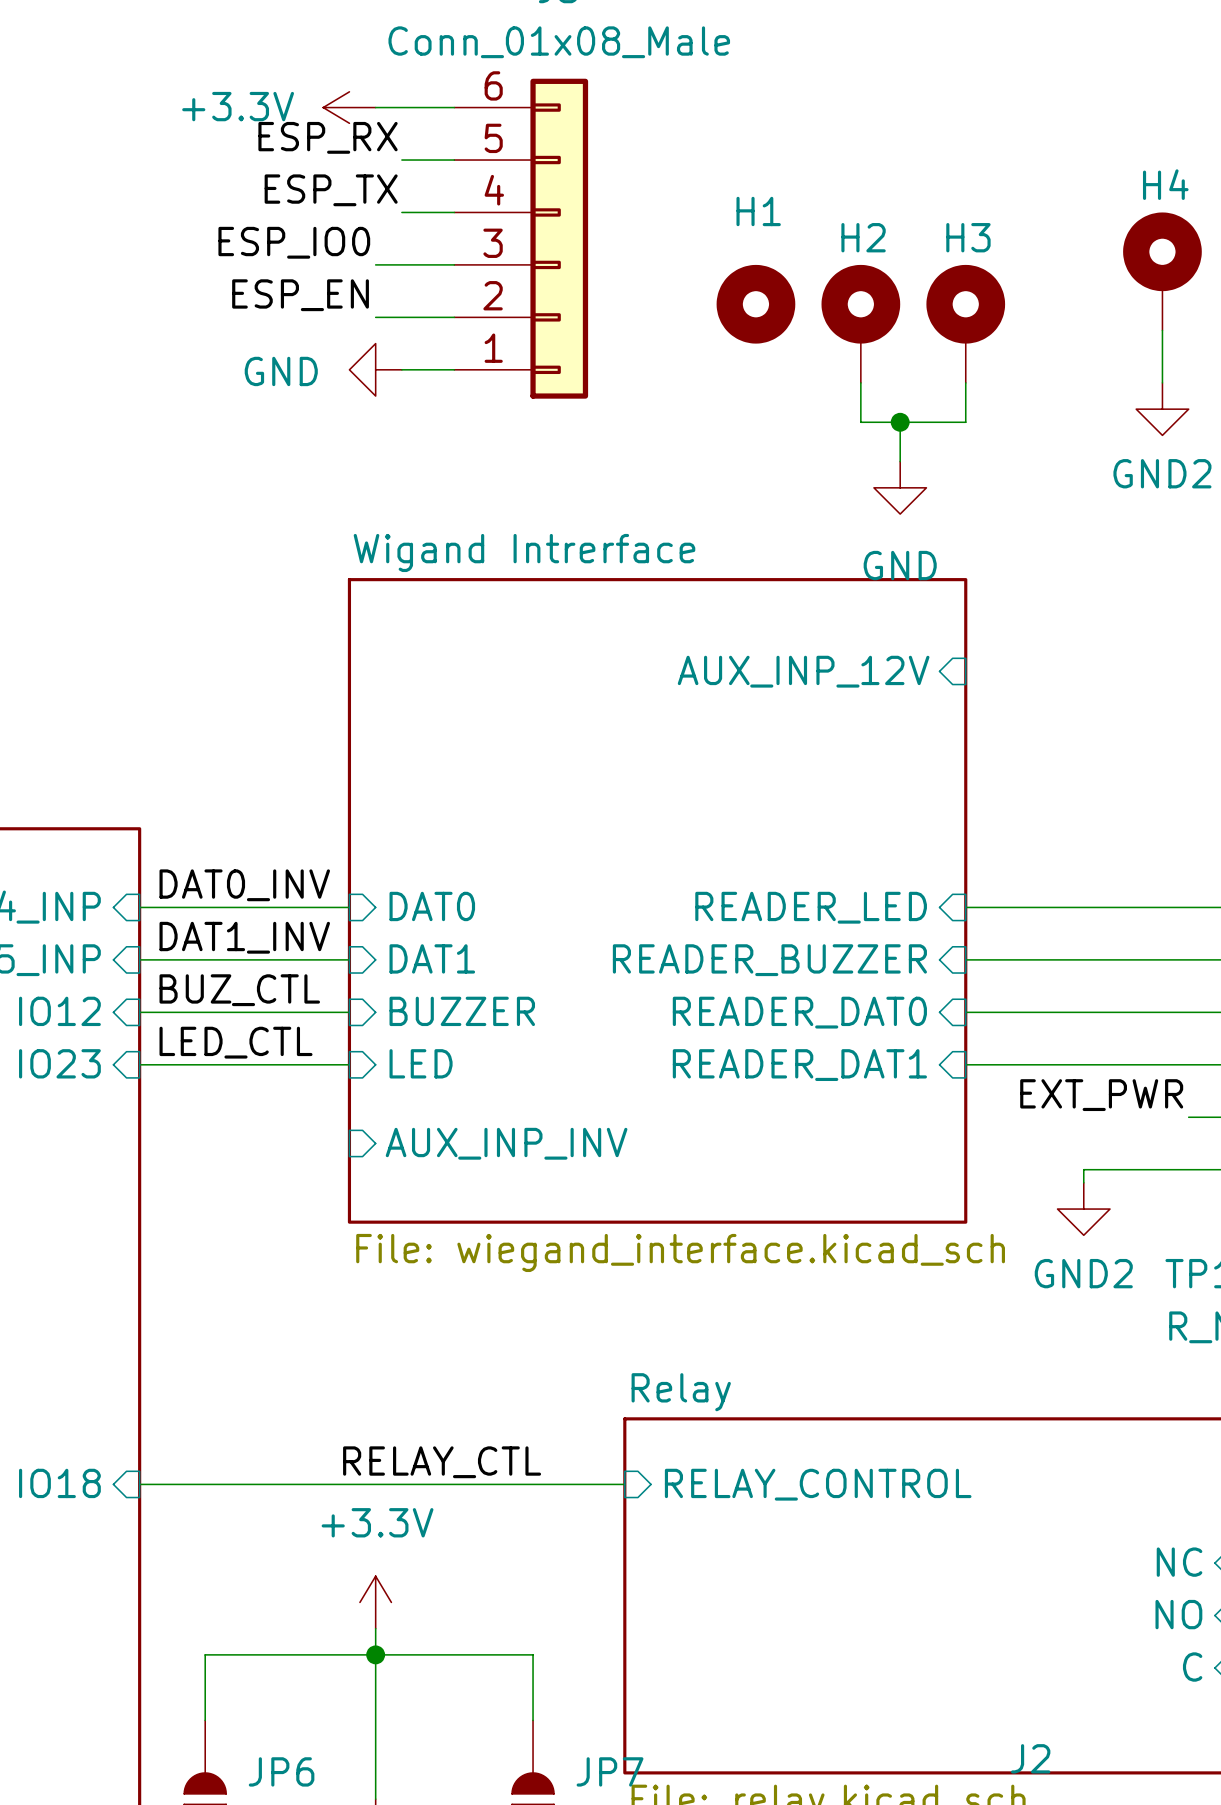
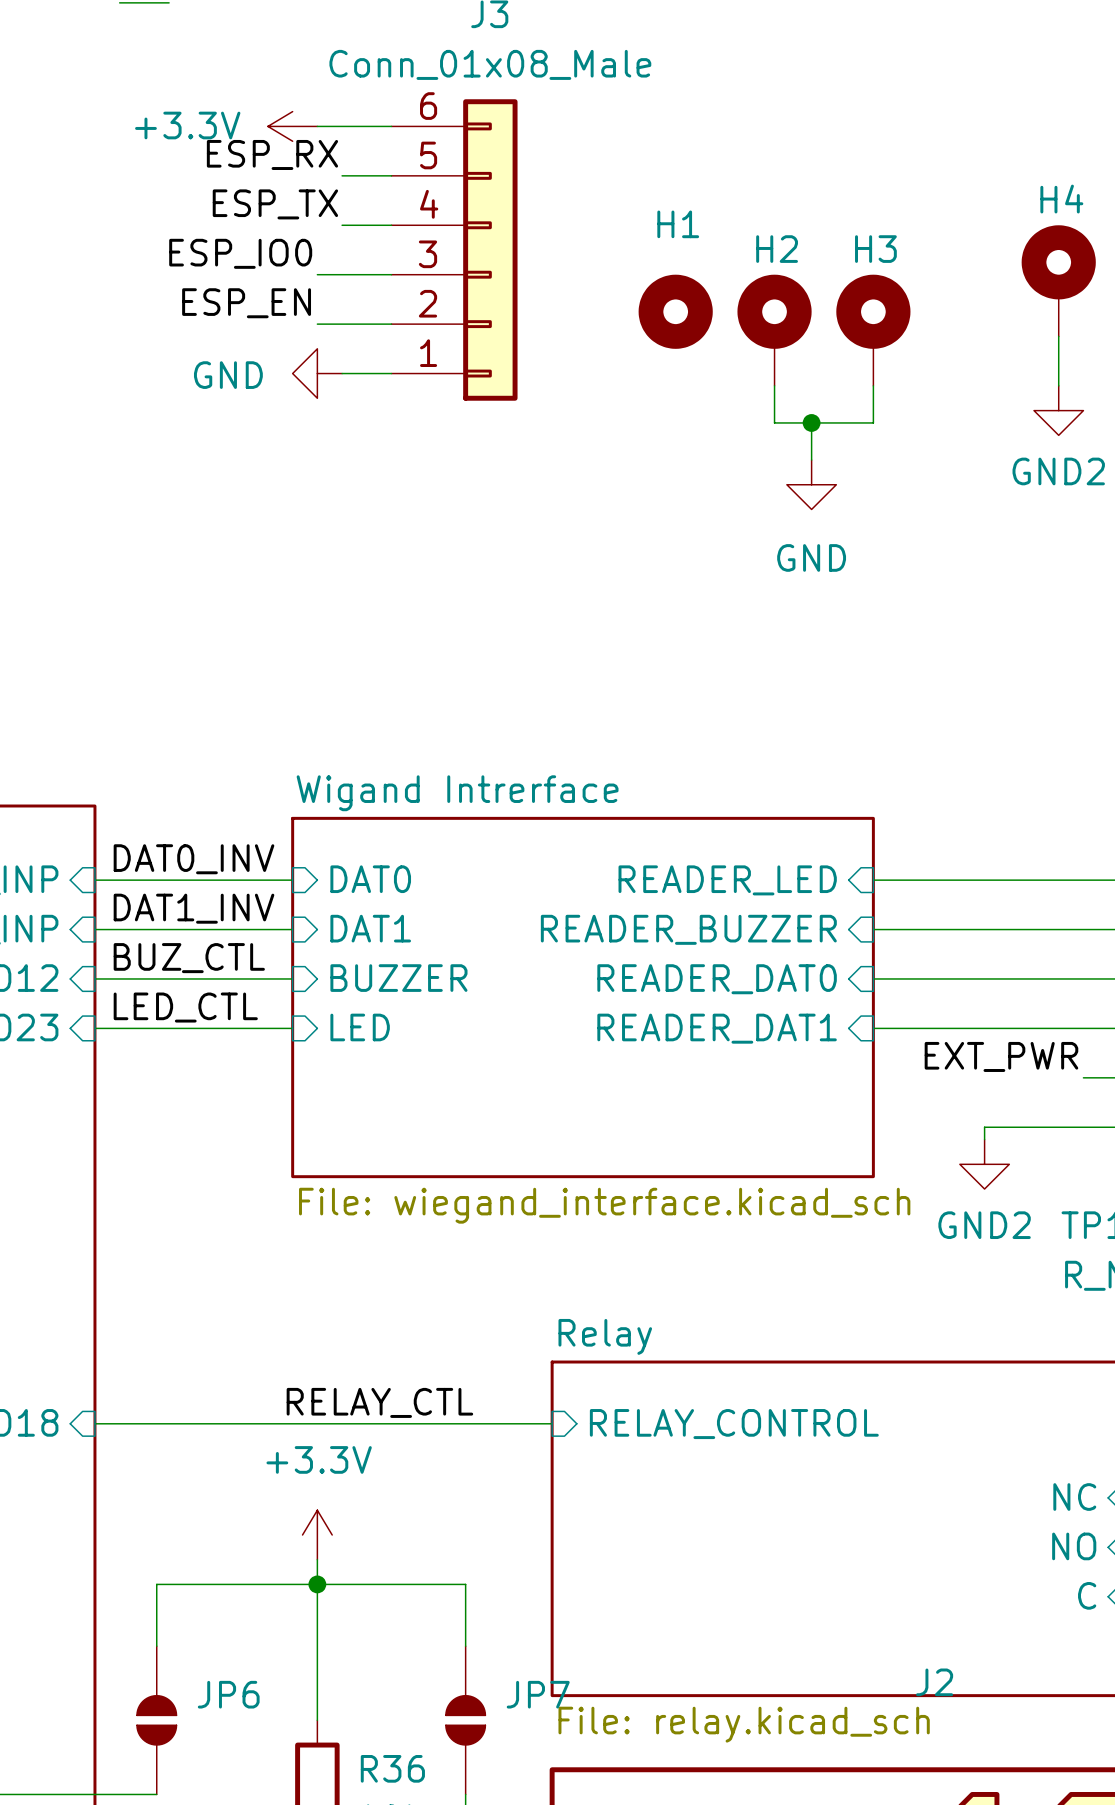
sheet pin: AUX_INP_12V (803, 671) -> none
sheet Wigand Intrerface: File: wiegand_interface.kicad_sch (657, 900) -> none
sheet Wigand Intrerface: none -> File: wiegand_interface.kicad_sch (583, 997)
sheet pin: AUX_INP_INV (506, 1143) -> none

